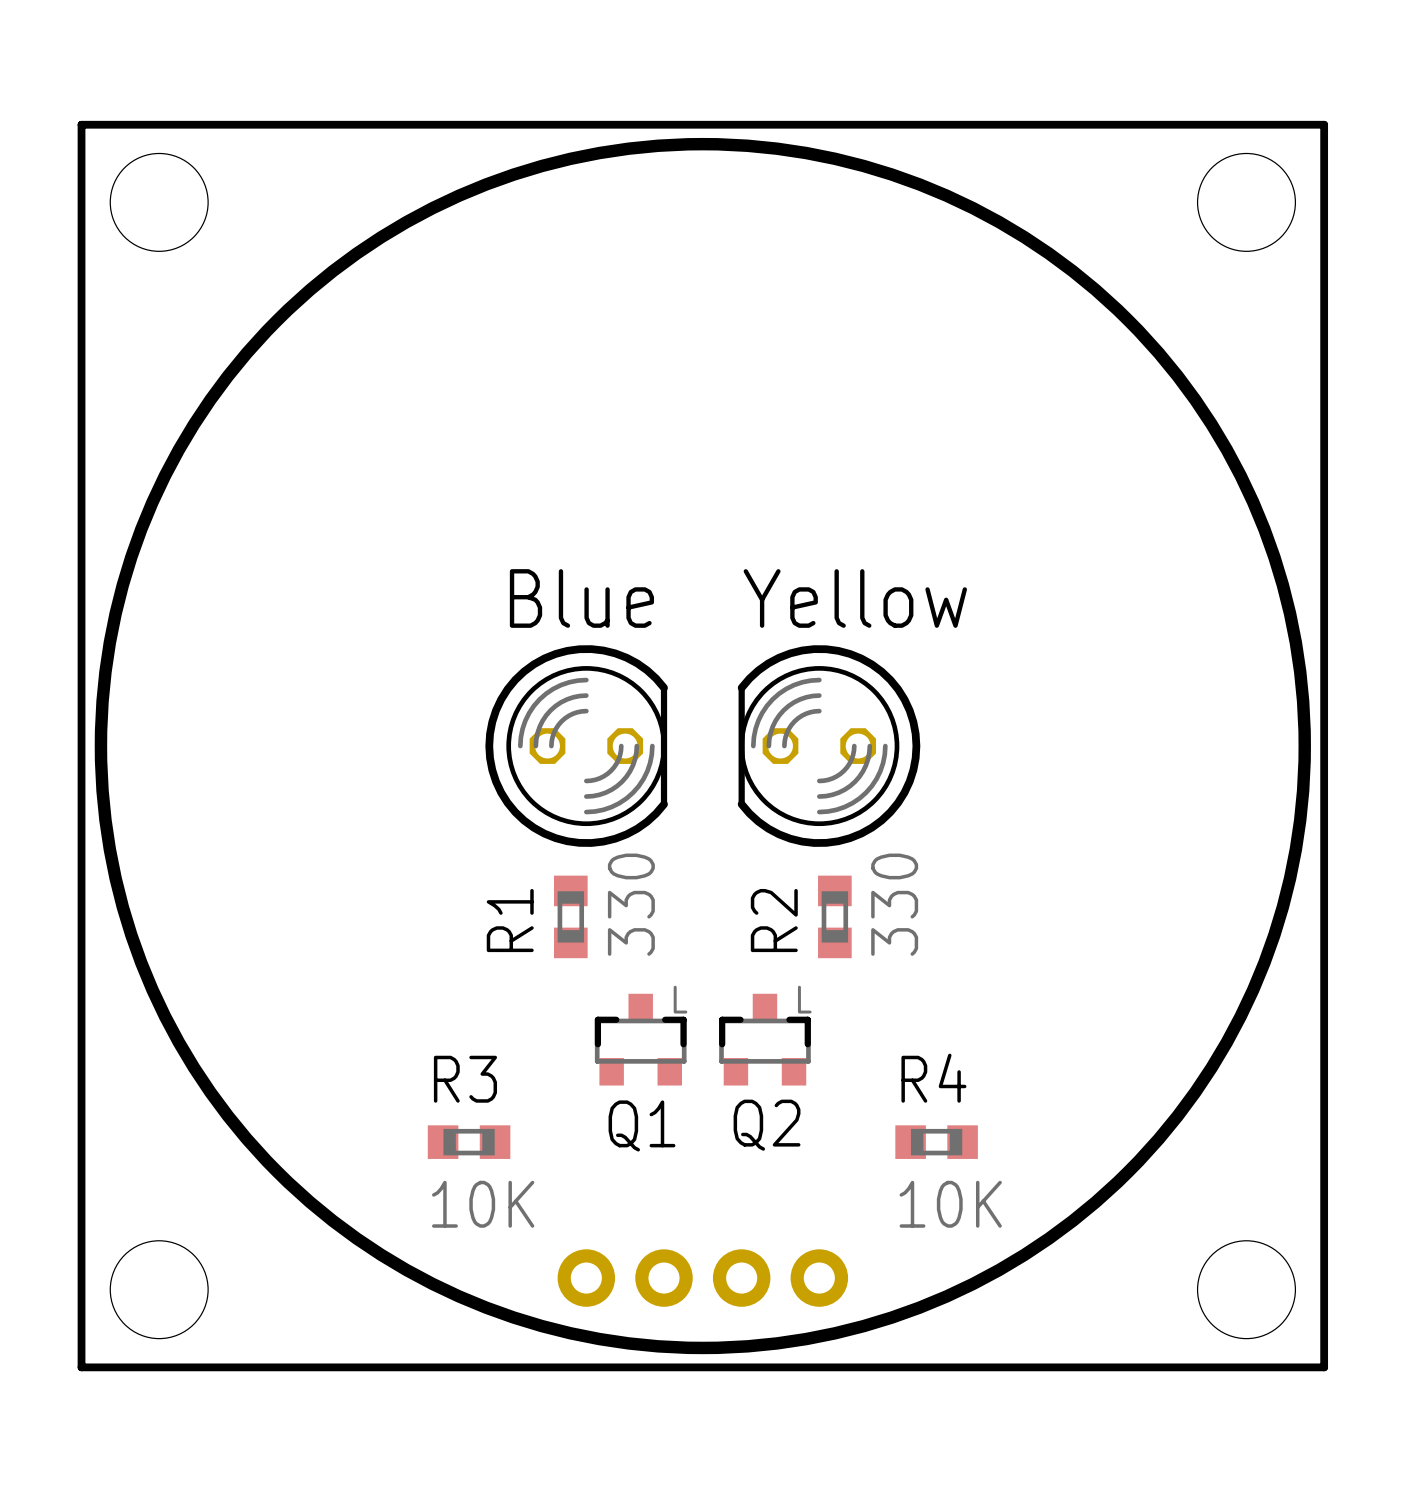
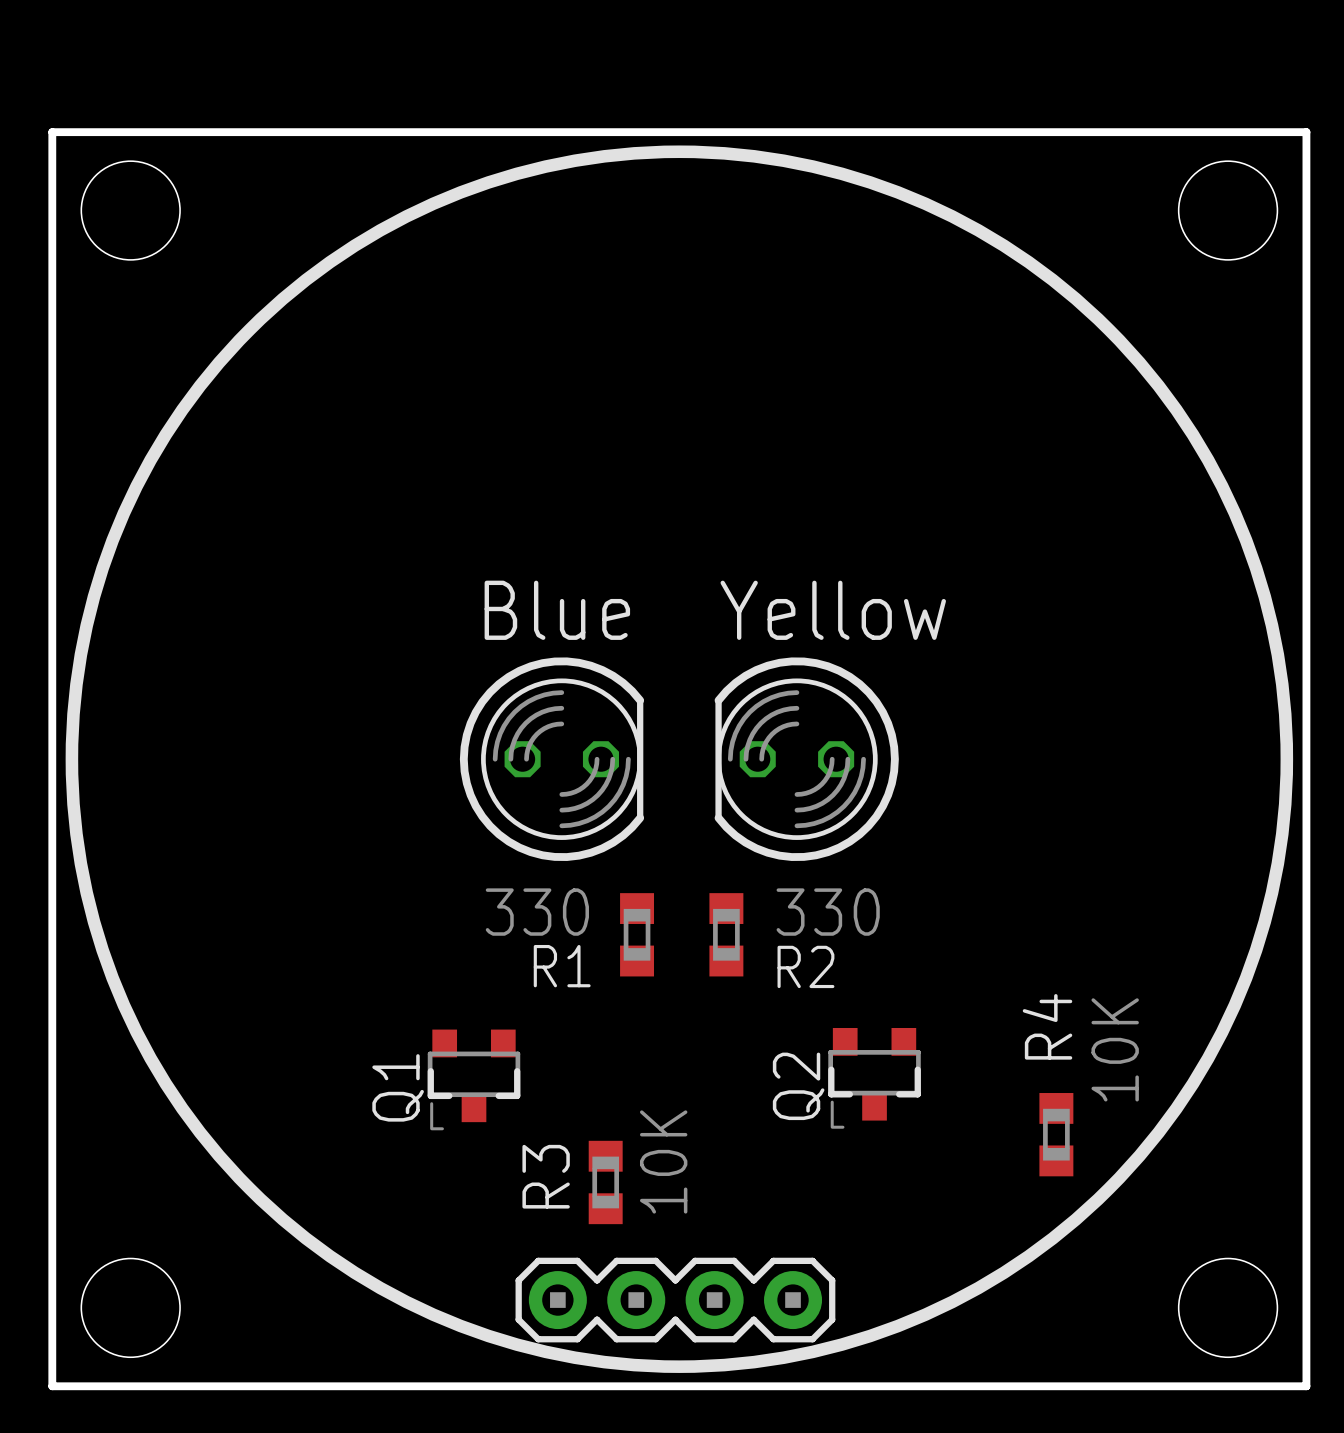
R1 value rotation: 0° (631, 904) -> 90° clockwise (537, 912)
R2 value rotation: 0° (894, 904) -> 90° clockwise (828, 912)
R1 position: (570, 916) -> (637, 934)
R2 position: (834, 916) -> (726, 934)
R1 name rotation: 0° (510, 920) -> 90° clockwise (562, 966)
R2 name rotation: 0° (774, 920) -> 90° clockwise (805, 966)
Q1 footprint: [594, 993, 687, 1086] -> [427, 1029, 521, 1123]
Q2 footprint: [719, 993, 811, 1086] -> [828, 1027, 921, 1121]
R3 name position: R3 (465, 1079) -> R3 (546, 1176)
Q1 name position: Q1 (641, 1125) -> Q1 (398, 1087)
Q2 name position: Q2 (767, 1125) -> Q2 (798, 1086)
R3 rotation: 0° (469, 1142) -> 90° clockwise (605, 1182)
R3 position: (469, 1142) -> (605, 1182)
R4 rotation: 0° (936, 1142) -> 90° clockwise (1056, 1134)
R4 position: (936, 1142) -> (1056, 1134)
R3 value position: 10K (483, 1204) -> 10K (663, 1161)
R4 value position: 10K (950, 1204) -> 10K (1115, 1049)
part side: bottom (702, 1278) -> top (675, 1300)

